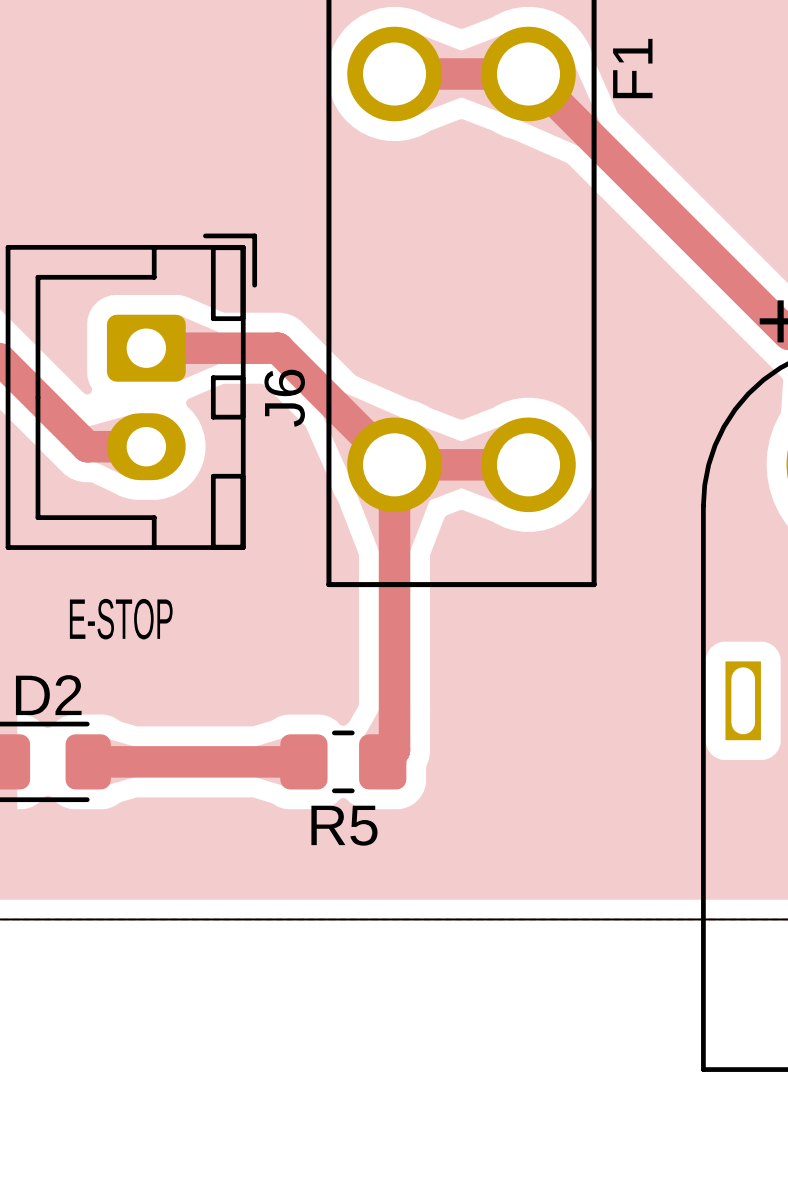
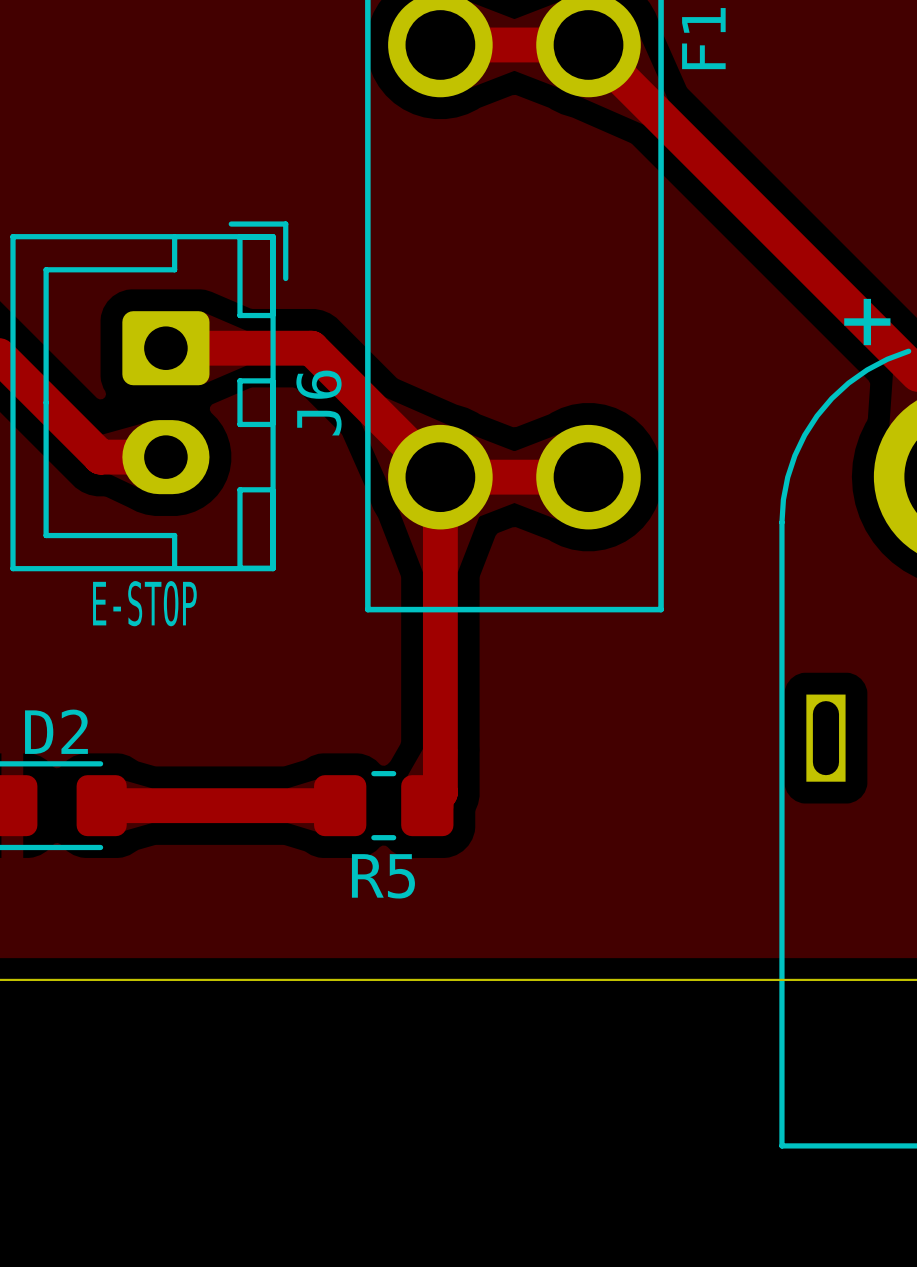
text position: E-STOP (121, 619) -> E-STOP (144, 603)

